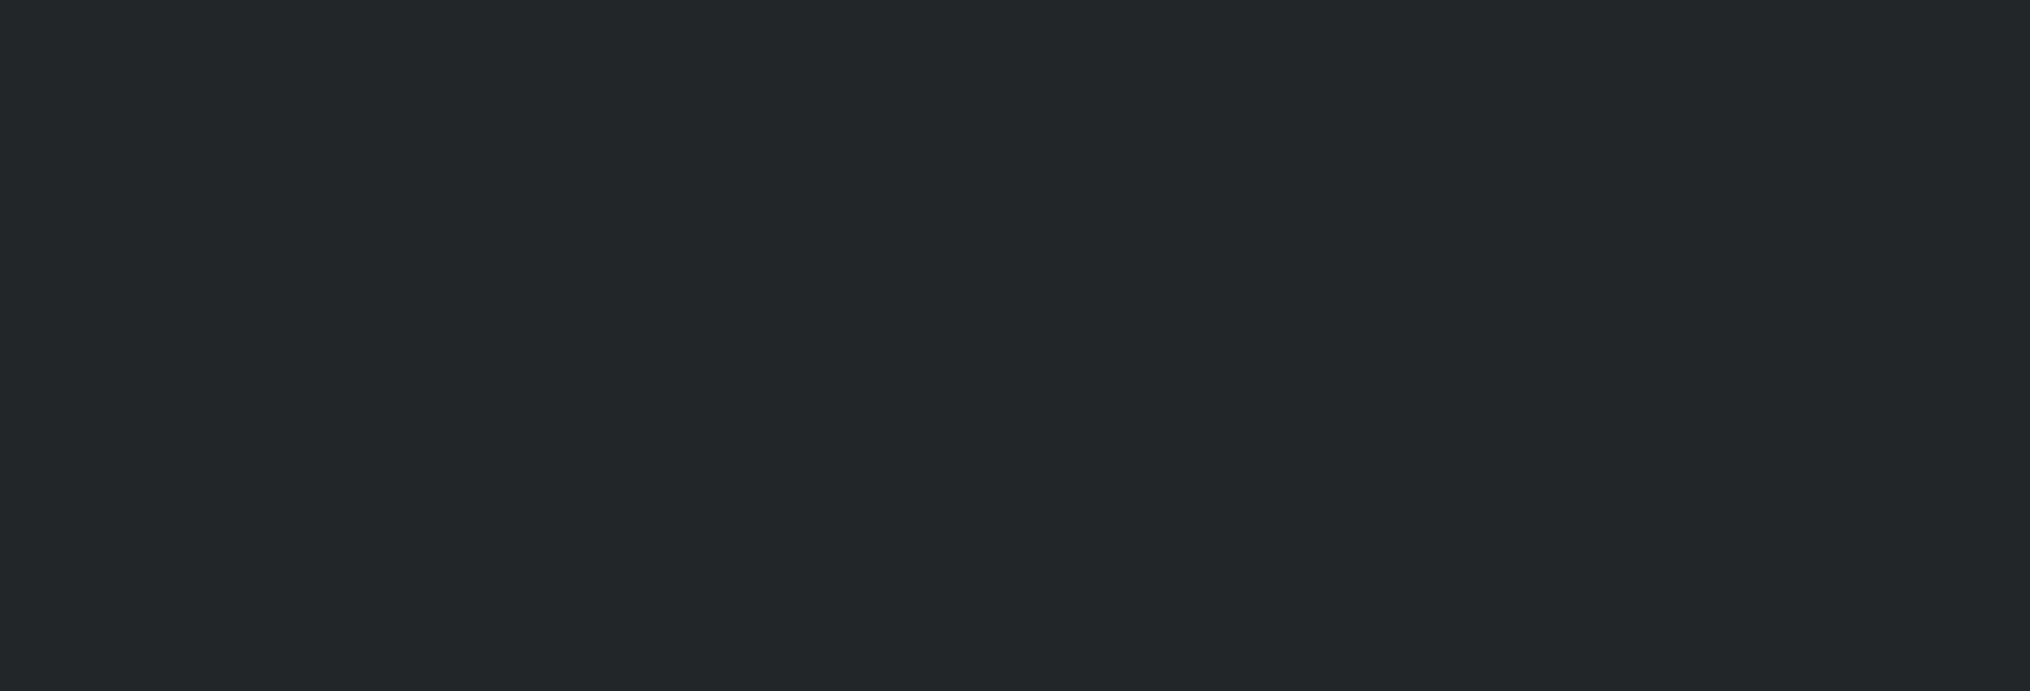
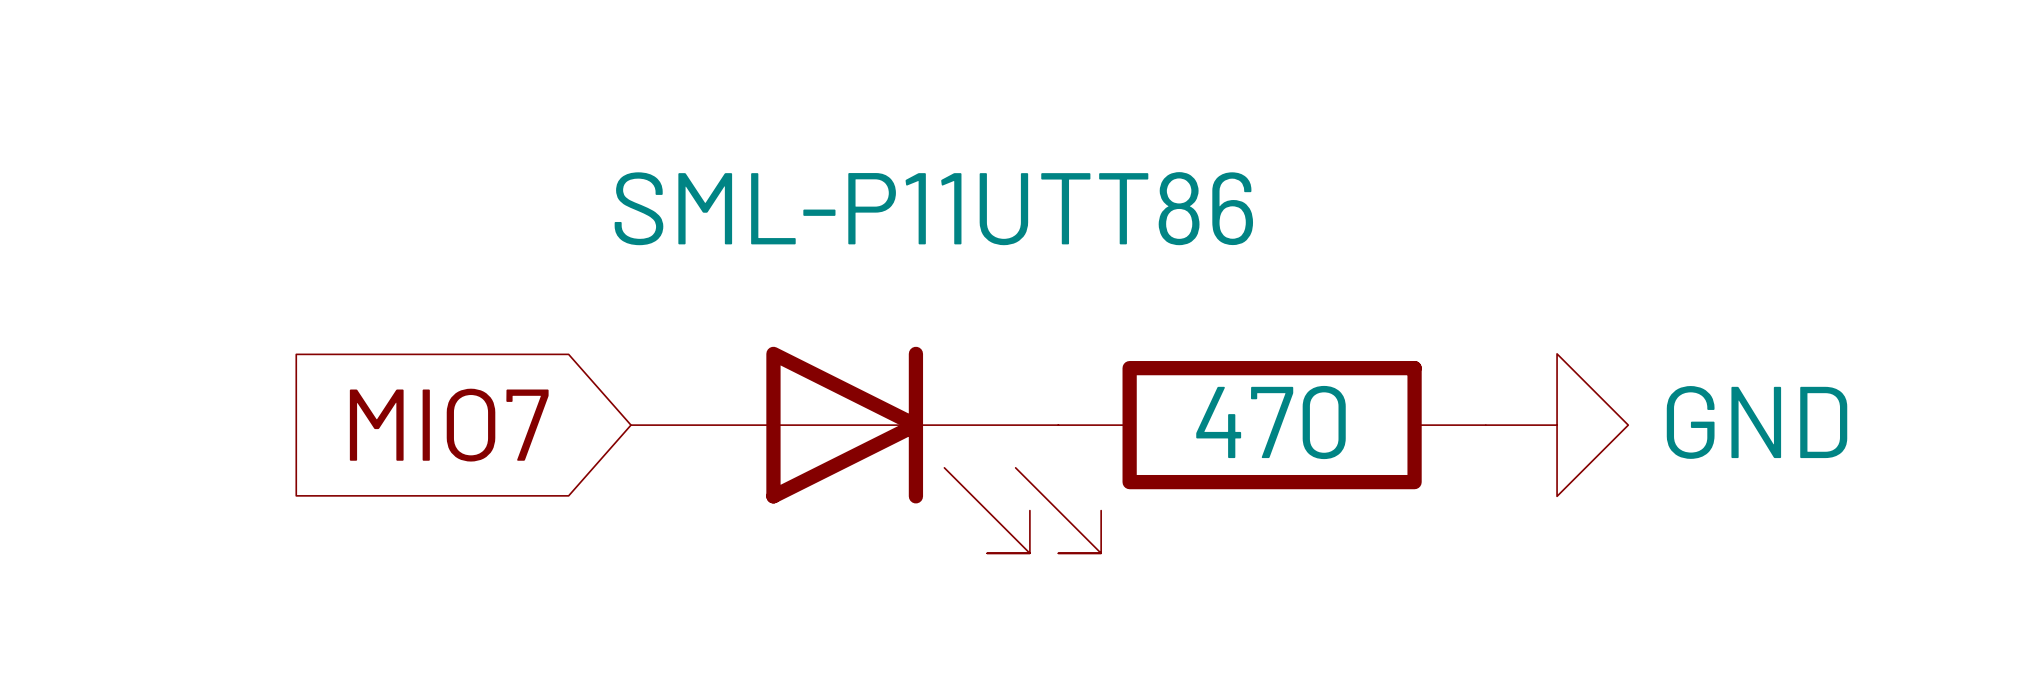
global label: none -> MIO7 (449, 425)
part: none -> 470 (1272, 425)
power symbol: none -> GND (1557, 425)
part: none -> SML-P11UTT86 (866, 450)

